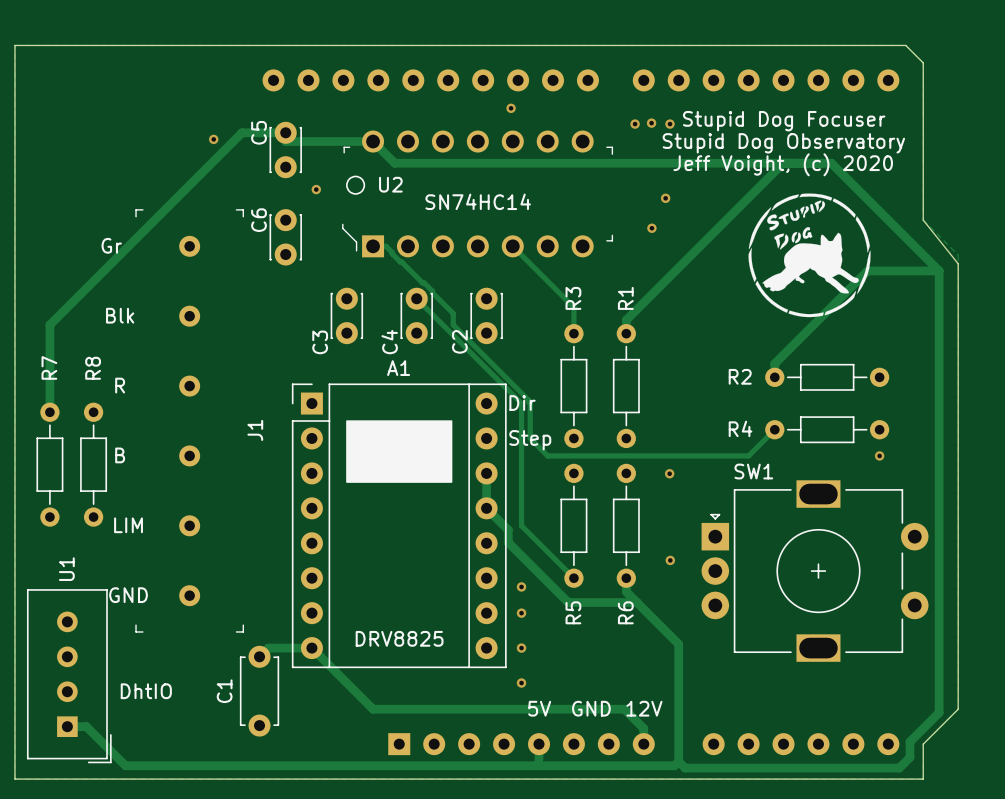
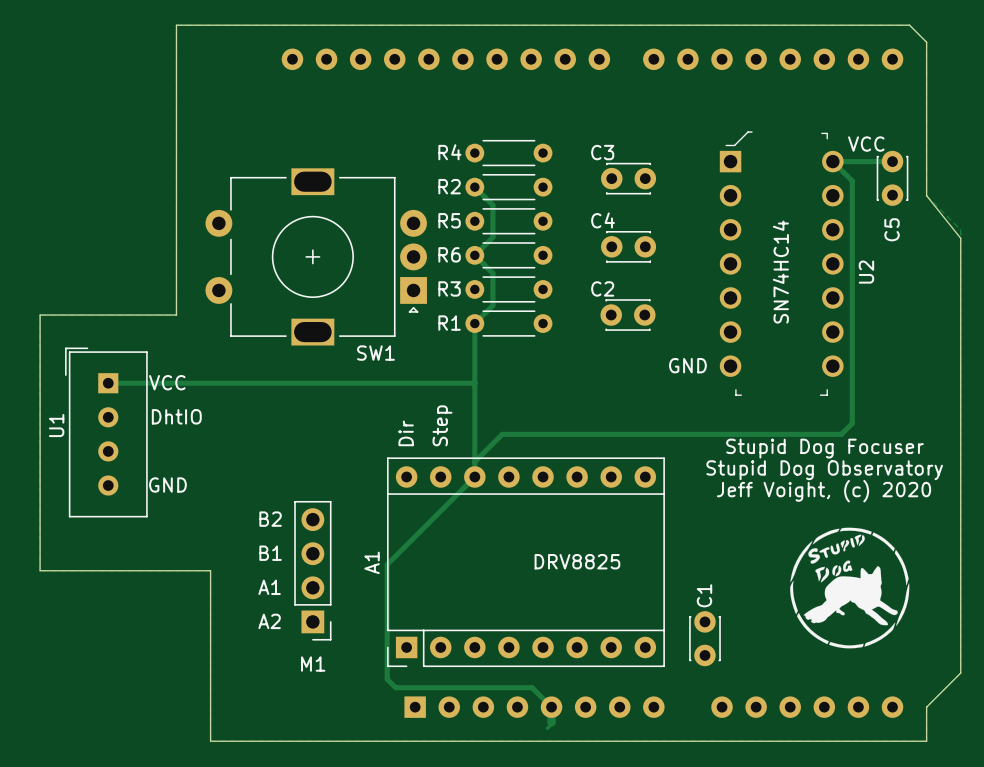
board edge: (154, 45) (14, 45) (14, 342) -> (176, 25) (176, 315) (40, 315)
via: (511, 108) -> none
text: Stupid Dog Focuser (784, 121) -> none
via: (651, 123) -> none
via: (635, 124) -> none
via: (670, 124) -> none
C5 name position: C5 (259, 132) -> C5 (892, 229)
via: (213, 139) -> none
text: Stupid Dog Observatory (783, 143) -> none
C5 position: (285, 149) -> (892, 178)
track: (783, 163) (626, 320) (626, 333) -> none
text: Jeff Voight, (c) 2020 (783, 164) -> none
text: none -> VCC (866, 144)
drawing: [346, 175, 366, 195] -> none
U2 name position: U2 (390, 184) -> U2 (866, 272)
track: none -> (892, 161) (832, 161) (852, 181) (852, 423) (841, 434) (502, 434) (474, 461)
via: (316, 189) -> none
U2 rotation: 0° (477, 193) -> 90° clockwise (781, 263)
U2 position: (477, 193) -> (781, 263)
drawing: [748, 193, 871, 318] -> none
via: (665, 198) -> none
text rotation: 0° (478, 201) -> 90° counterclockwise (780, 272)
text position: SN74HC14 (478, 201) -> SN74HC14 (780, 272)
track: none -> (474, 187) (492, 205) (492, 237) (474, 255) (492, 273) (492, 305) (474, 323) (474, 476) (387, 564) (387, 679) (395, 687) (532, 687) (551, 707)
via: (651, 228) -> none
C6: (285, 237) -> none
text: Gr (111, 245) -> none
track: (373, 246) (386, 246) (424, 283) (453, 313) (453, 324) (528, 400) (530, 438) (547, 455) (748, 455) (774, 429) -> none
track: (512, 246) (573, 307) (573, 333) -> none
track: (939, 270) (831, 163) (394, 163) (373, 141) (285, 141) (285, 132) (242, 132) (49, 324) (49, 412) -> none
track: (939, 270) (867, 270) (774, 363) (774, 377) -> none
track: (939, 270) (939, 712) (909, 741) (909, 757) (899, 768) (685, 768) (678, 761) -> none
track: (416, 298) (521, 403) (521, 525) (573, 578) -> none
R3 name position: R3 (573, 298) -> R3 (449, 288)
R1 name position: R1 (625, 298) -> R1 (449, 323)
text: Blk (120, 315) -> none
C3 rotation: 0° (346, 315) -> 90° clockwise (628, 178)
C3 position: (346, 315) -> (628, 178)
C4 rotation: 0° (416, 315) -> 90° clockwise (628, 246)
C4 position: (416, 315) -> (628, 246)
C2 rotation: 0° (486, 315) -> 90° clockwise (628, 315)
C2 position: (486, 315) -> (628, 315)
R3 footprint: [560, 324, 588, 449] -> [465, 276, 553, 303]
R1 footprint: [612, 324, 640, 449] -> [465, 310, 553, 337]
R2 footprint: [765, 363, 890, 391] -> [465, 174, 553, 201]
text: R (120, 385) -> none
text: none -> GND (687, 365)
text rotation: 0° (522, 403) -> 90° counterclockwise (406, 433)
text position: Dir (522, 403) -> Dir (406, 433)
text: none -> VCC (167, 382)
track: none -> (108, 383) (474, 383)
R4 footprint: [765, 416, 890, 444] -> [465, 139, 553, 167]
J1: (189, 420) -> none
drawing: [346, 420, 453, 483] -> none
text rotation: 0° (530, 440) -> 90° counterclockwise (442, 425)
text position: Step (530, 440) -> Step (442, 425)
text: B (120, 455) -> none
via: (879, 455) -> none
R5 footprint: [560, 463, 588, 588] -> [465, 208, 553, 235]
R6 footprint: [612, 463, 640, 588] -> [465, 242, 553, 269]
R7: (49, 464) -> none
R8: (93, 464) -> none
track: (486, 473) (486, 508) (508, 530) (508, 542) (568, 602) (636, 602) -> none
via: (669, 473) -> none
text: none -> Stupid Dog Focuser (824, 448)
text: none -> Stupid Dog Observatory (824, 470)
text: none -> Jeff Voight, (c) 2020 (824, 491)
text: LIM (128, 525) -> none
A1 rotation: 0° (399, 525) -> 90° counterclockwise (525, 562)
text: none -> B2 (270, 519)
via: (670, 560) -> none
drawing: none -> [790, 527, 910, 649]
U1 name position: U1 (66, 569) -> U1 (56, 425)
SW1 rotation: 0° (815, 571) -> 180° (316, 256)
SW1 position: (815, 571) -> (316, 256)
track: (626, 578) (626, 591) (678, 644) (678, 761) -> none
text: none -> B1 (270, 553)
via: (521, 586) -> none
text position: GND (128, 595) -> GND (167, 485)
board edge: (14, 604) (14, 779) (189, 779) -> (40, 570) (210, 570) (210, 741)
M1: none -> (312, 570)
R5 name position: R5 (573, 612) -> R5 (449, 220)
R6 name position: R6 (625, 612) -> R6 (449, 254)
via: (521, 613) -> none
text: none -> A1 (269, 587)
text position: DRV8825 (399, 638) -> DRV8825 (577, 561)
C1 footprint: [239, 645, 280, 737] -> [689, 611, 721, 667]
via: (521, 648) -> none
text: none -> A2 (269, 621)
track: (259, 656) (268, 648) (311, 648) (373, 709) (624, 709) (643, 728) (643, 744) -> none
U1 rotation: 0° (69, 676) -> 180° (106, 432)
U1 position: (69, 676) -> (106, 432)
via: (521, 683) -> none
text position: DhtIO (146, 691) -> DhtIO (176, 416)
C1 name position: C1 (224, 691) -> C1 (704, 595)
text: 5V (539, 708) -> none
text: GND (591, 708) -> none
text: 12V (644, 708) -> none
track: (67, 726) (86, 726) (125, 765) (674, 765) (678, 761) -> none

